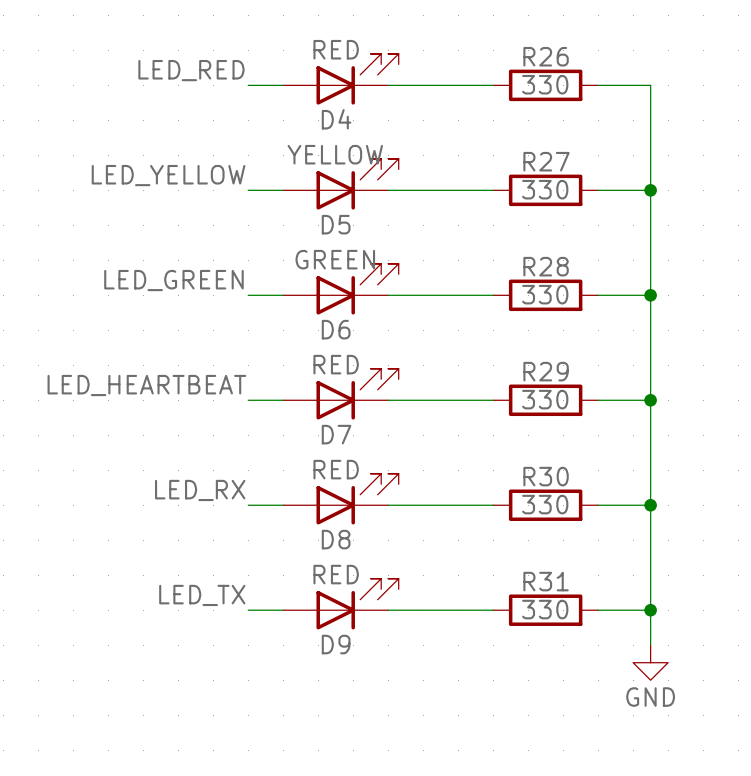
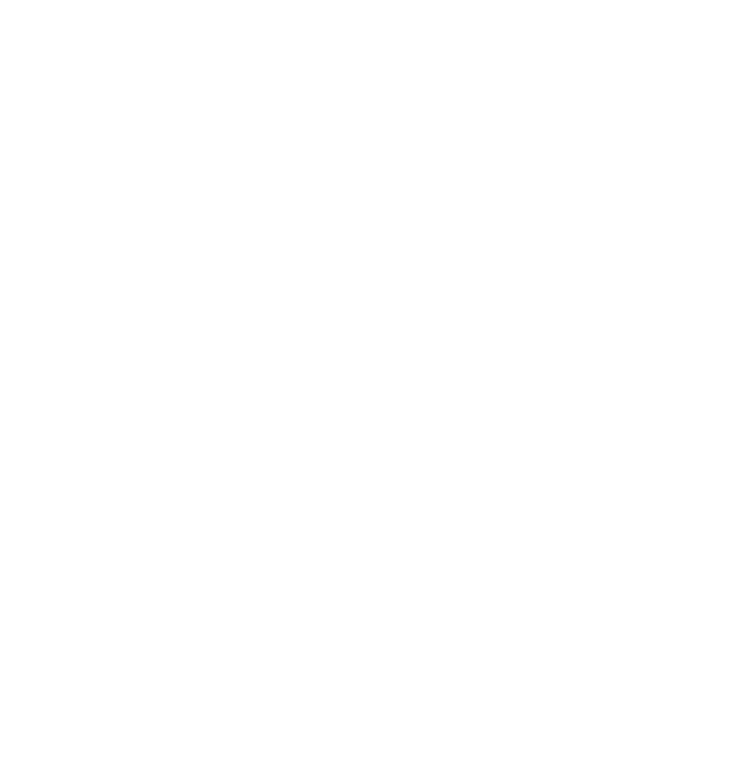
label: LED_RED (191, 70) -> none
D4: RED (340, 79) -> none
wire: (248, 85) (283, 85) -> none
wire: (388, 85) (493, 85) -> none
R26: 330 (545, 85) -> none
wire: (598, 85) (650, 85) (650, 645) -> none
label: LED_YELLOW (168, 175) -> none
D5: YELLOW (340, 184) -> none
wire: (248, 190) (283, 190) -> none
wire: (388, 190) (493, 190) -> none
R27: 330 (545, 190) -> none
wire: (598, 190) (650, 190) -> none
junction: (650, 190) -> none
label: LED_GREEN (173, 280) -> none
D6: GREEN (340, 289) -> none
wire: (248, 295) (283, 295) -> none
wire: (388, 295) (493, 295) -> none
R28: 330 (545, 295) -> none
wire: (598, 295) (650, 295) -> none
junction: (650, 295) -> none
label: LED_HEARTBEAT (146, 385) -> none
D7: RED (340, 394) -> none
wire: (248, 400) (283, 400) -> none
wire: (388, 400) (493, 400) -> none
R29: 330 (545, 400) -> none
wire: (598, 400) (650, 400) -> none
junction: (650, 400) -> none
label: LED_RX (200, 490) -> none
D8: RED (340, 499) -> none
wire: (248, 505) (283, 505) -> none
wire: (388, 505) (493, 505) -> none
R30: 330 (545, 505) -> none
wire: (598, 505) (650, 505) -> none
junction: (650, 505) -> none
label: LED_TX (202, 595) -> none
D9: RED (340, 604) -> none
wire: (248, 610) (283, 610) -> none
wire: (388, 610) (493, 610) -> none
R31: 330 (545, 610) -> none
wire: (598, 610) (650, 610) -> none
junction: (650, 610) -> none
power symbol: GND (650, 662) -> none

